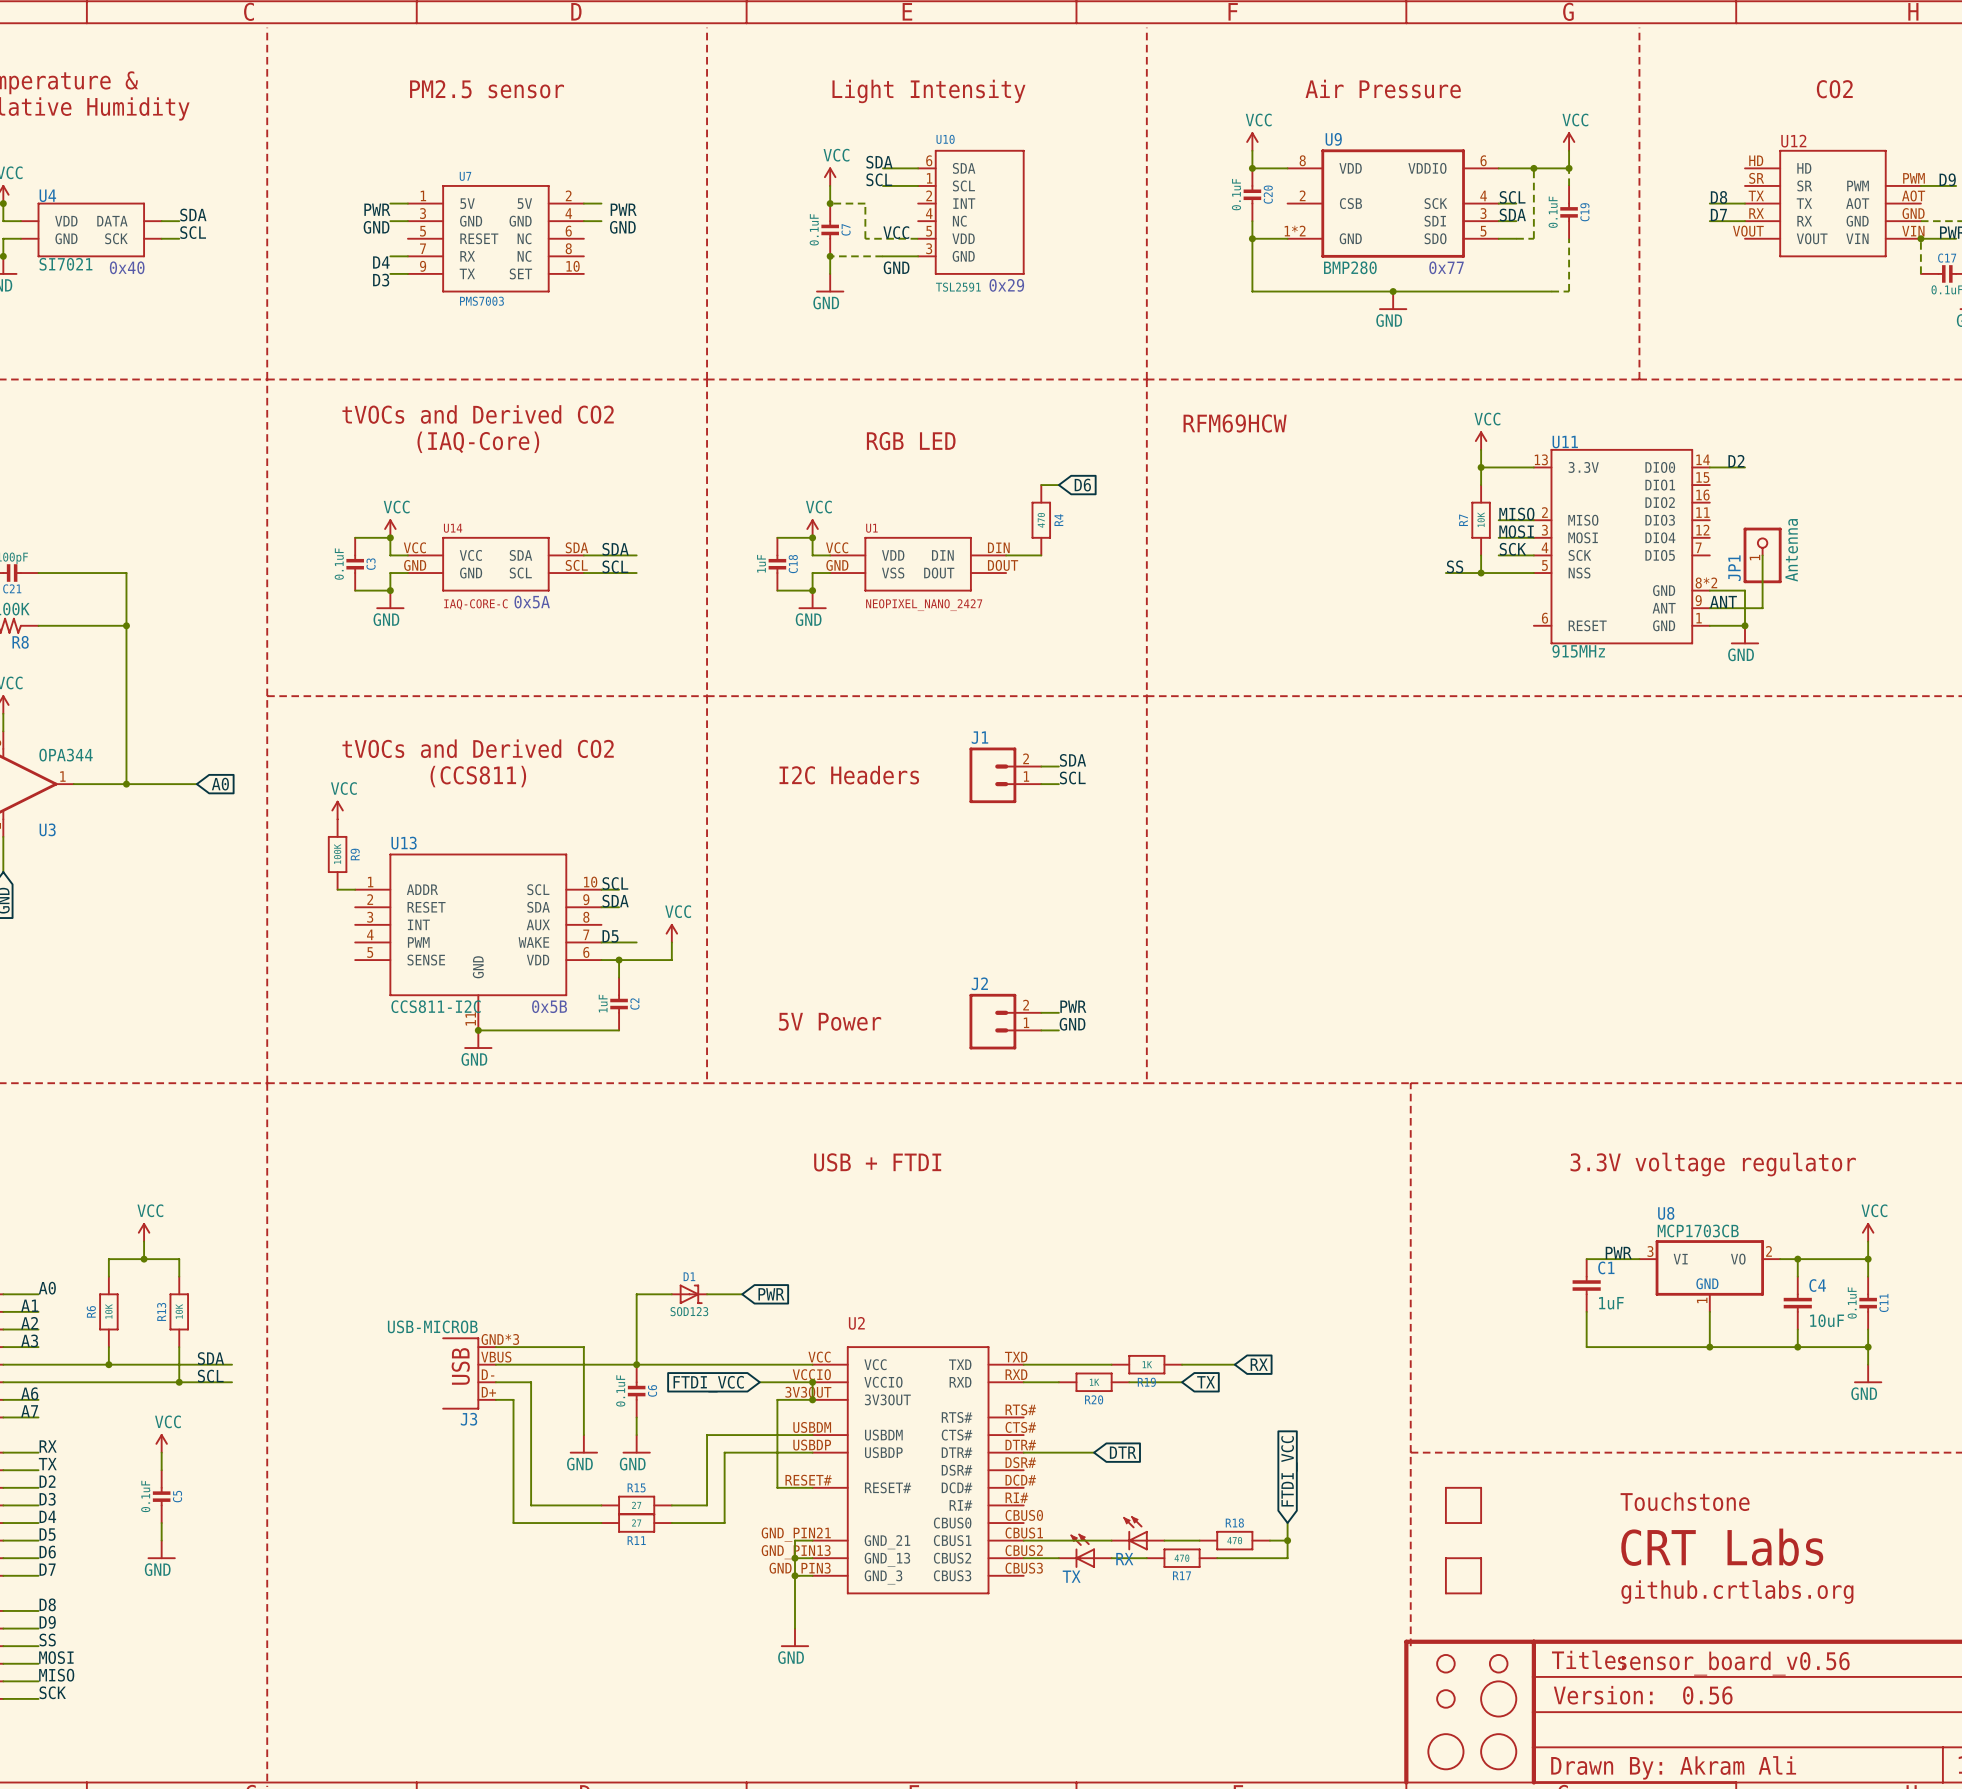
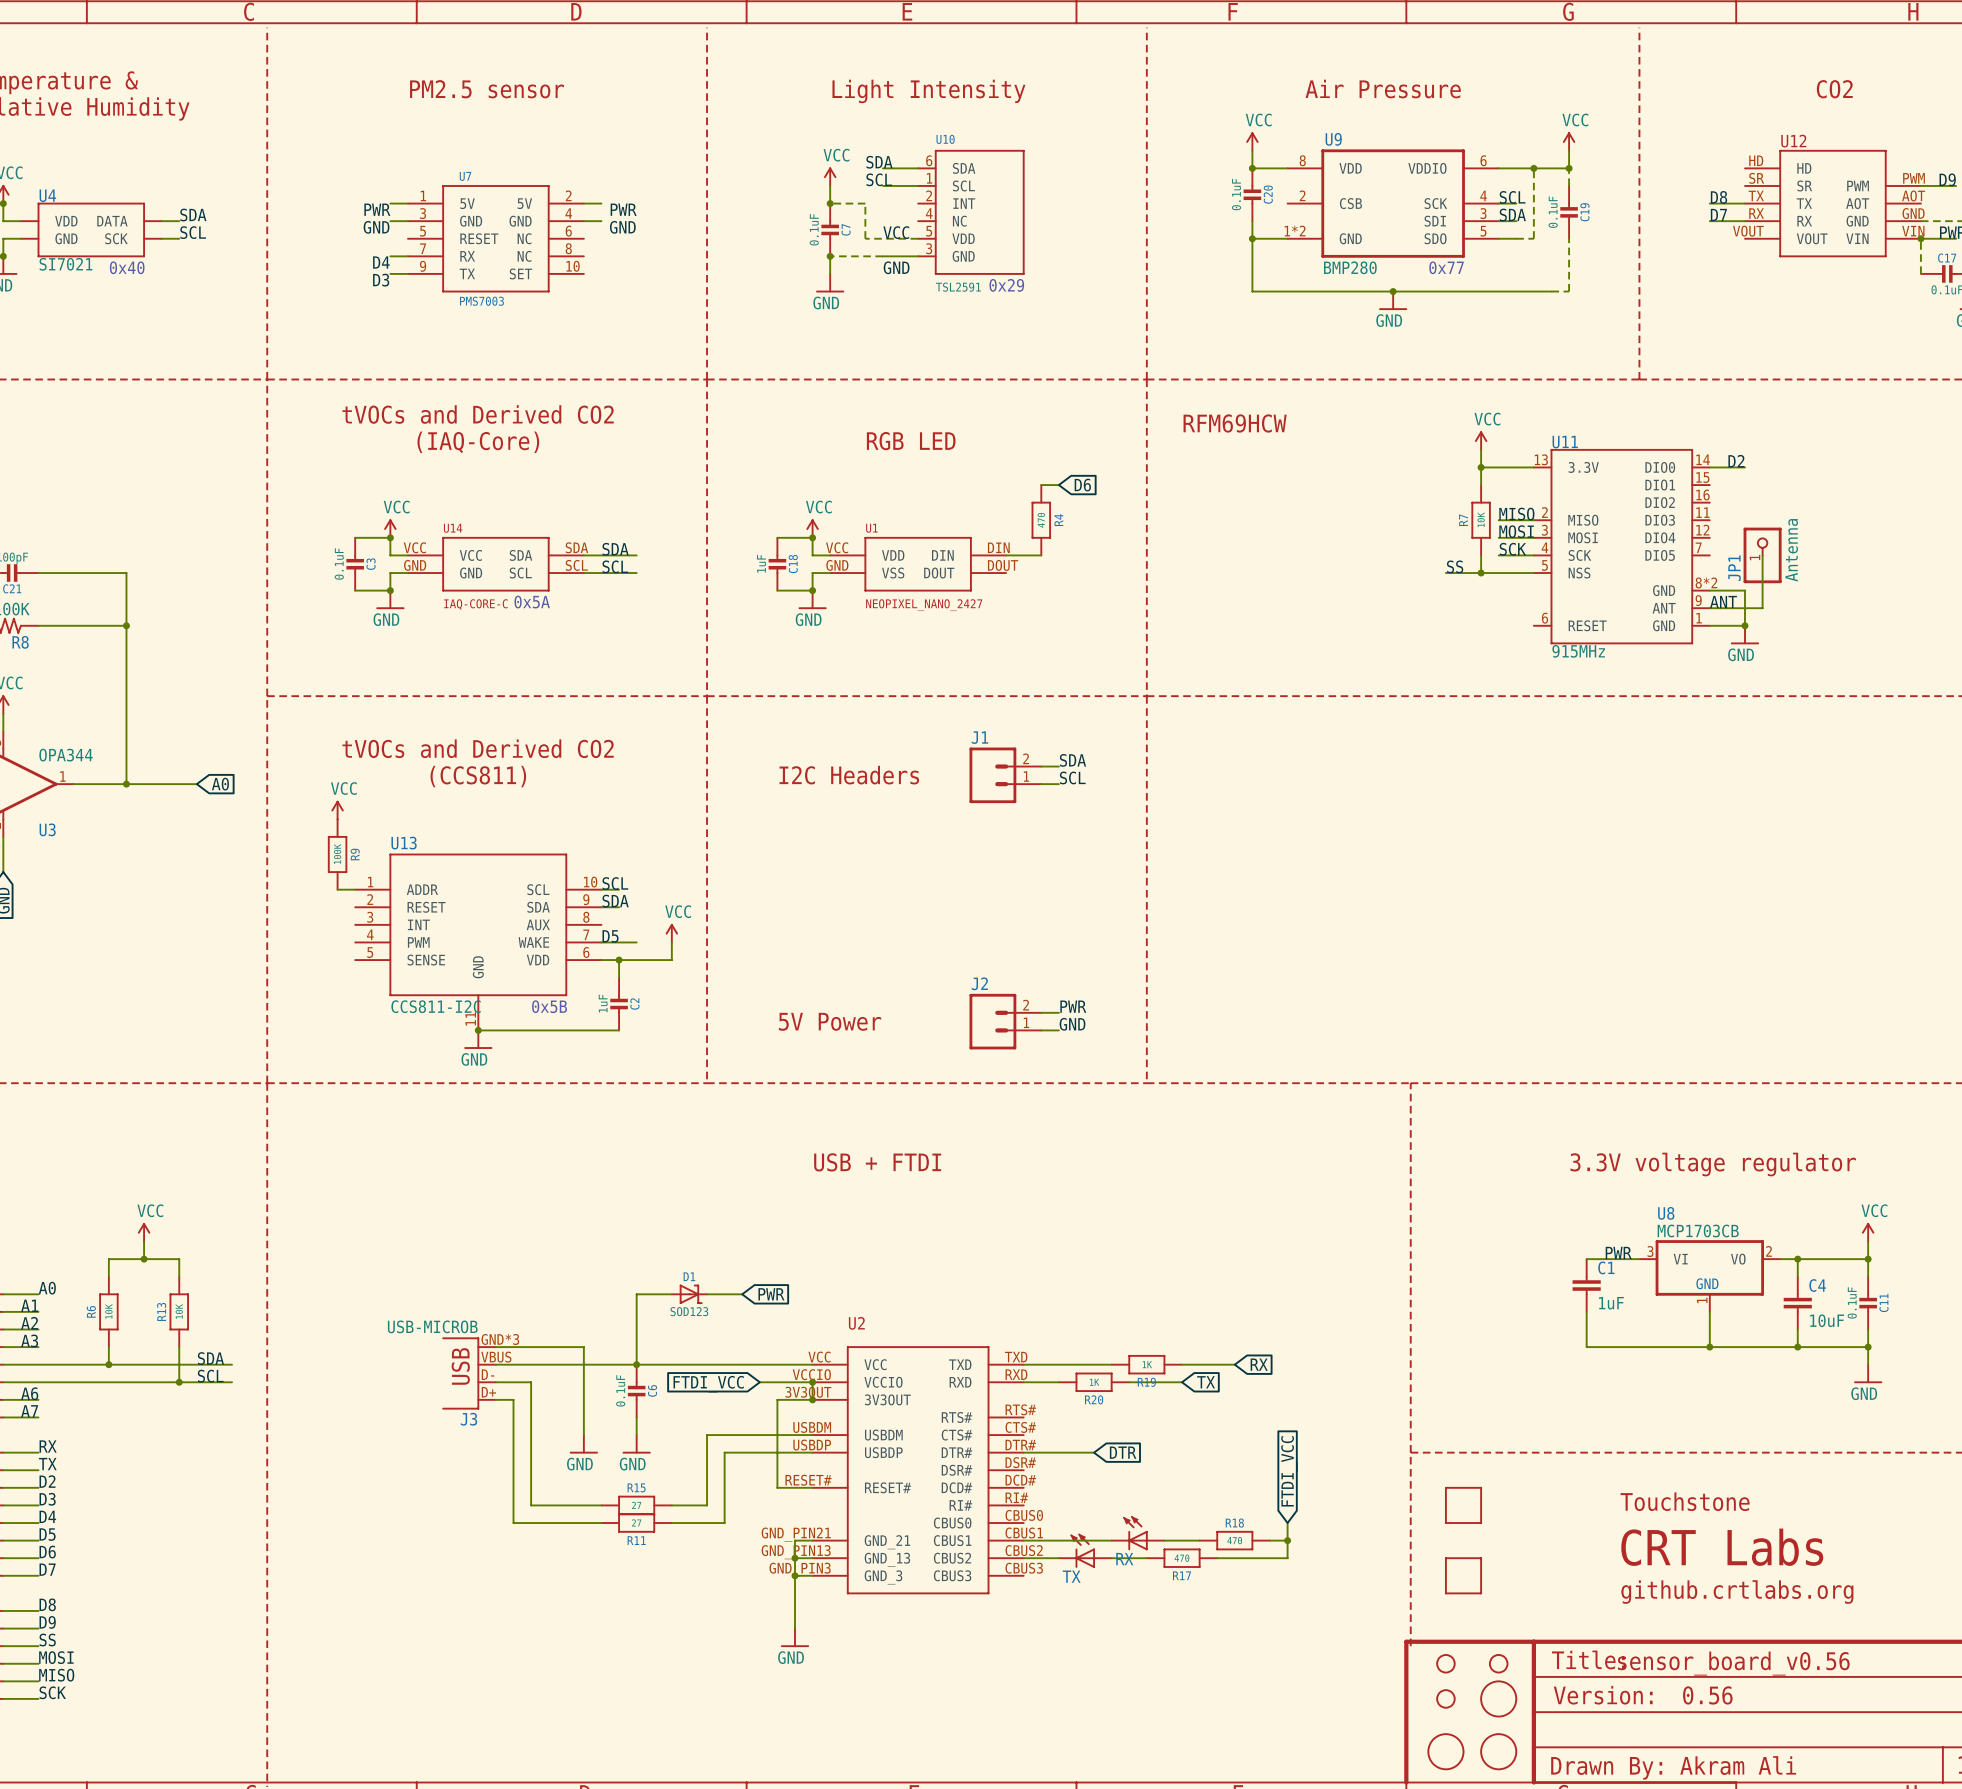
power symbol: VCC (161, 1443) -> none
wire: (161, 1452) (161, 1470) -> none
C5: 0.1uF (161, 1496) -> none
wire: (161, 1523) (161, 1540) -> none
power symbol: GND (161, 1549) -> none

